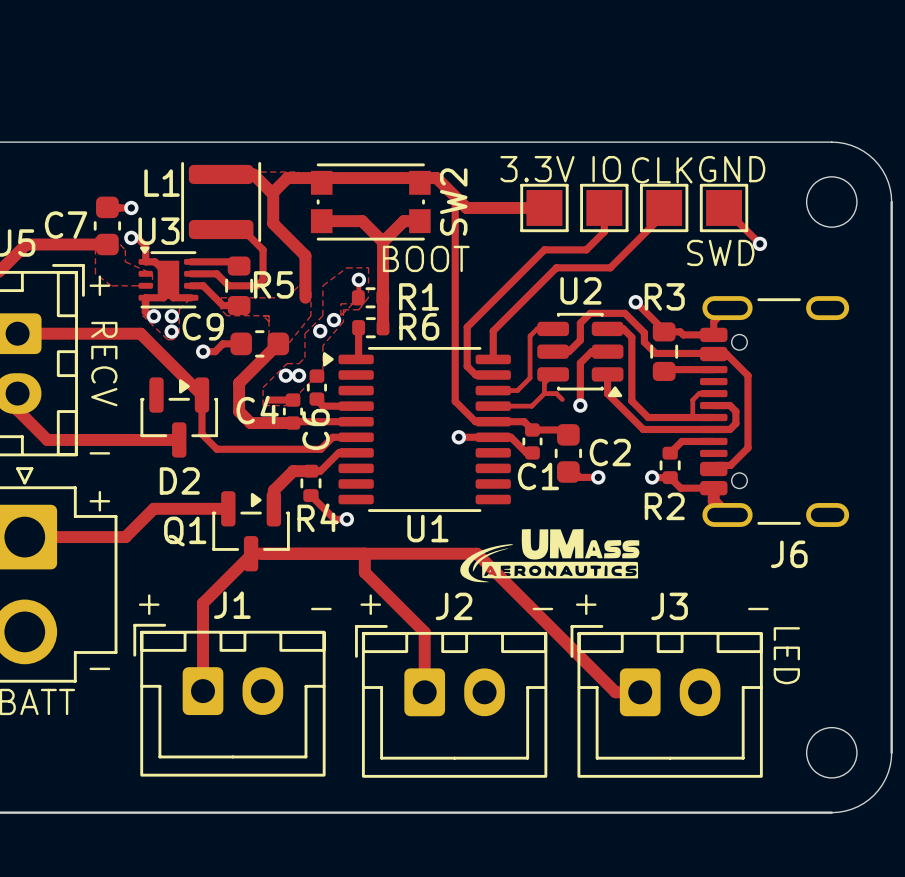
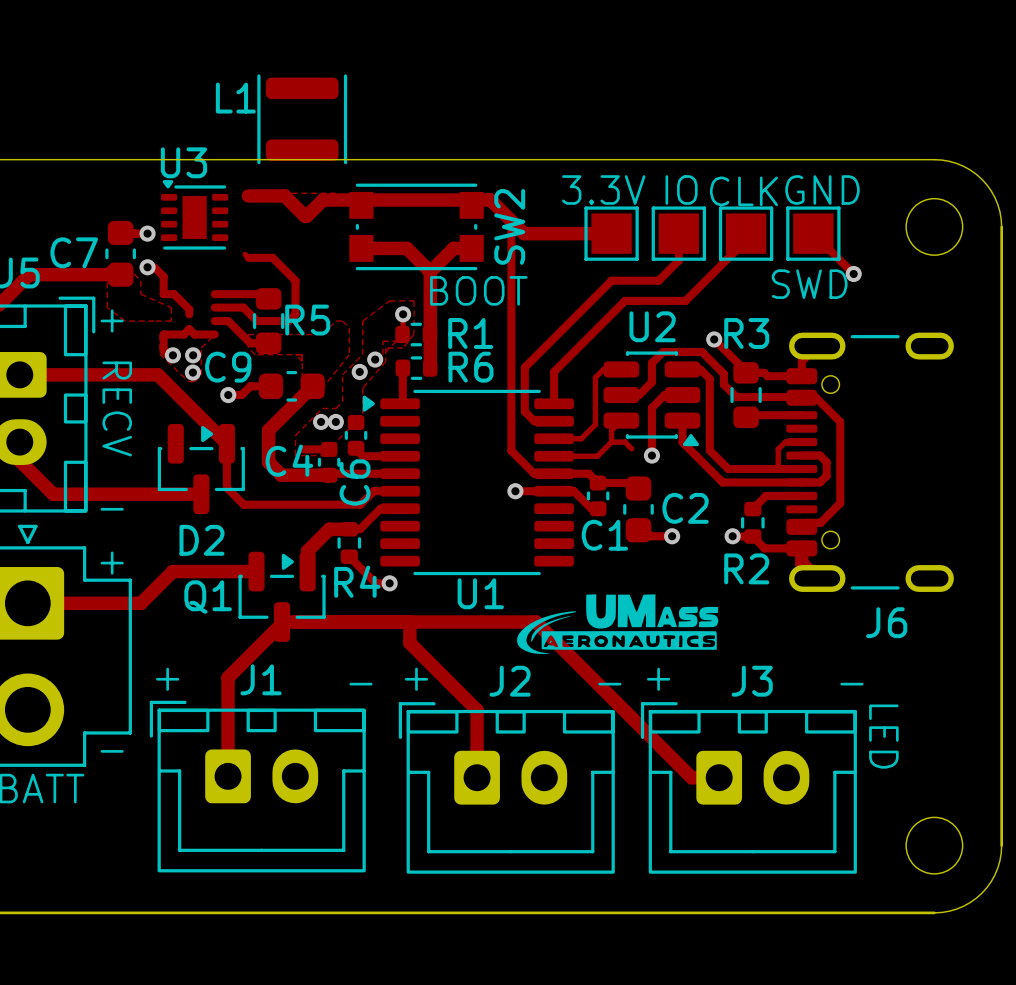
track: (273, 192) (273, 223) (305, 255) (305, 297) -> none
L1 position: (221, 201) -> (302, 119)
U3 position: (168, 277) -> (194, 214)

